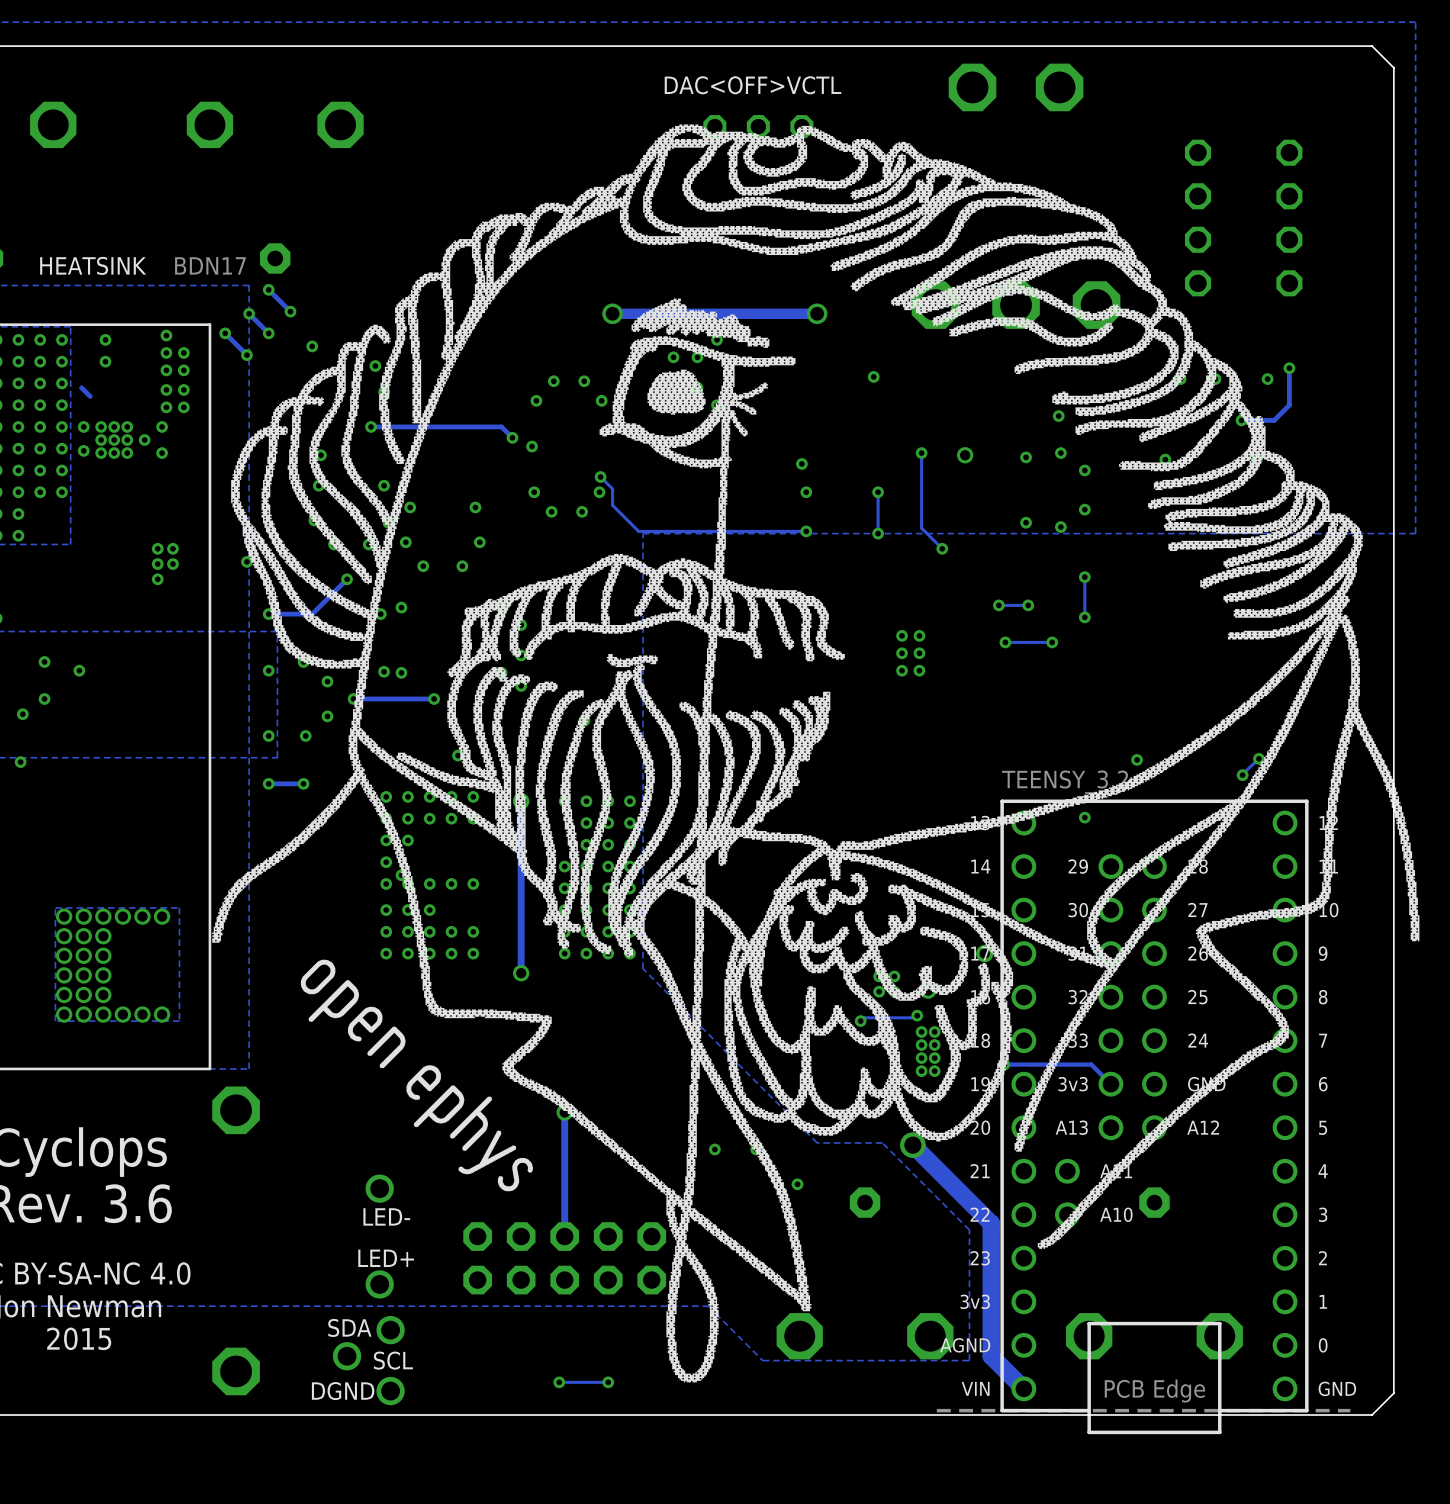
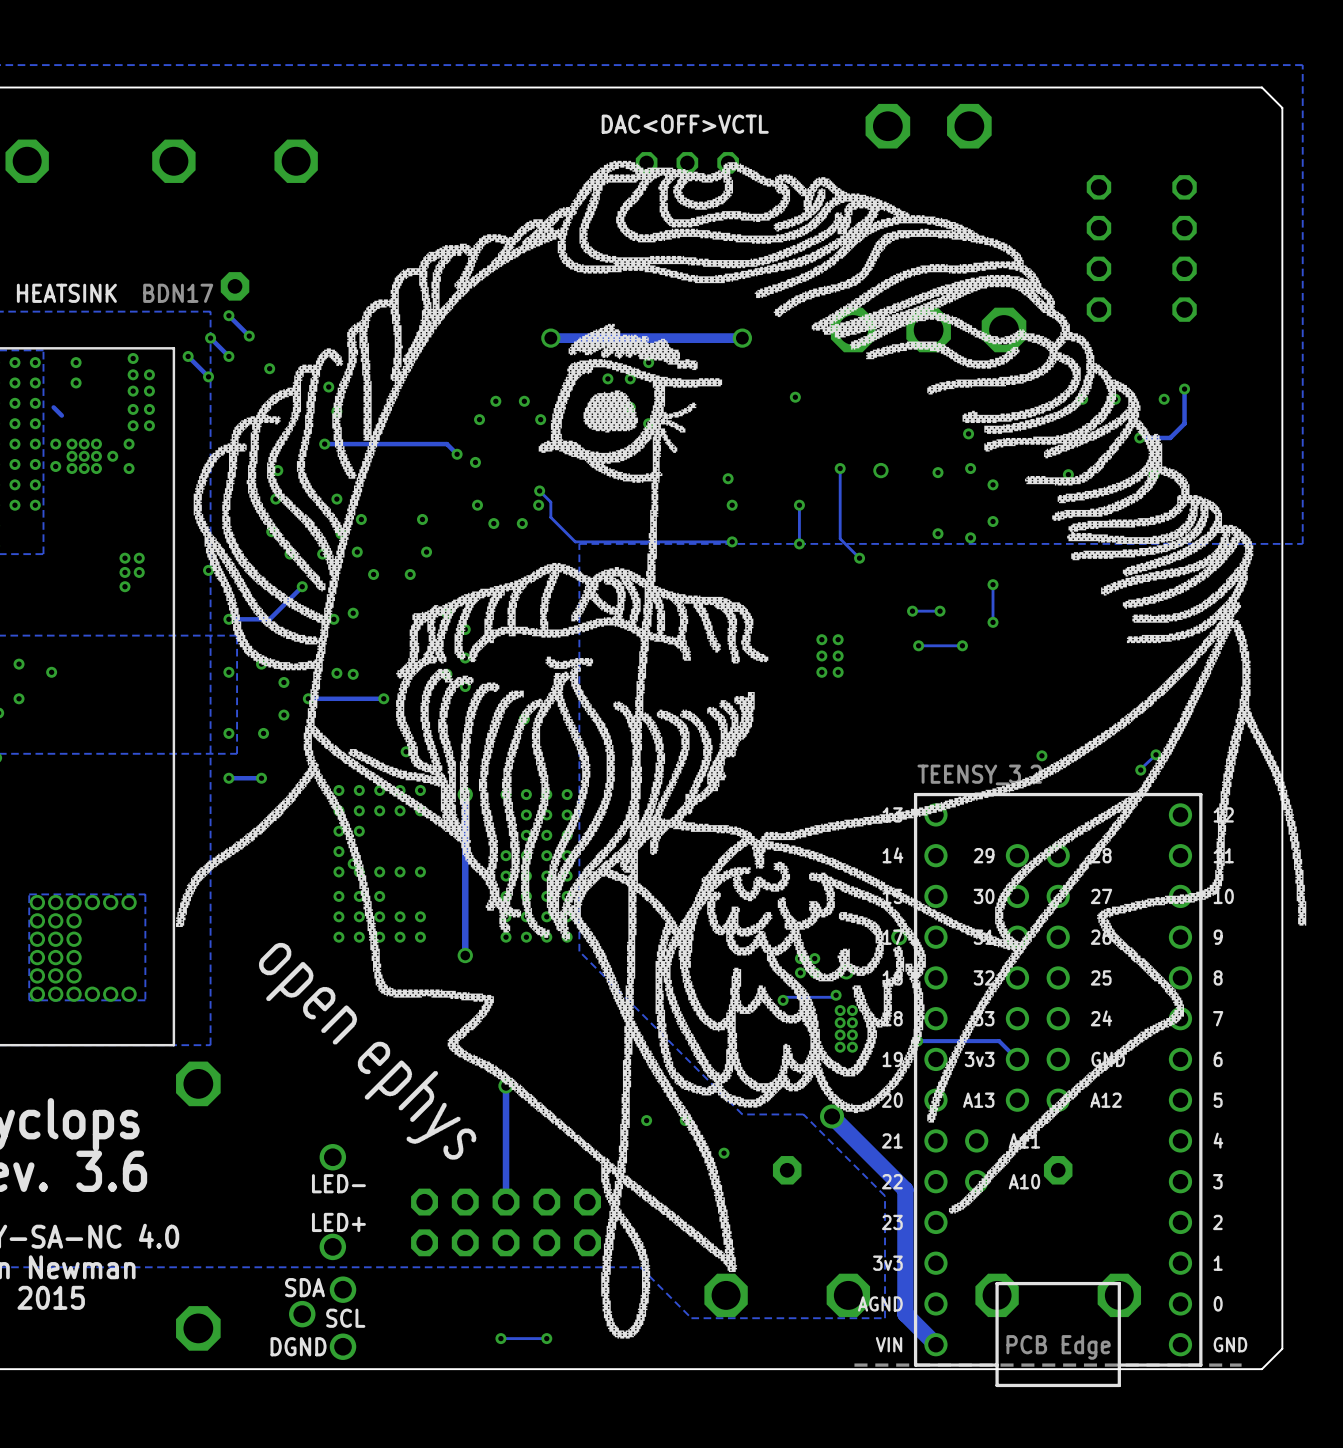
via: (1084, 817) -> none

